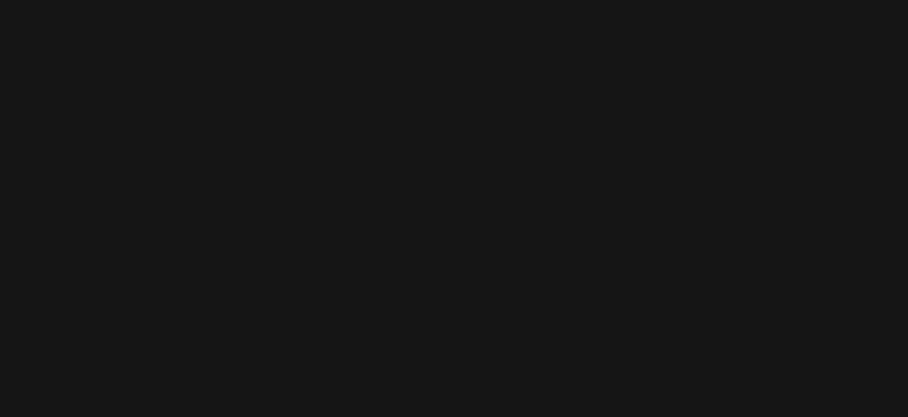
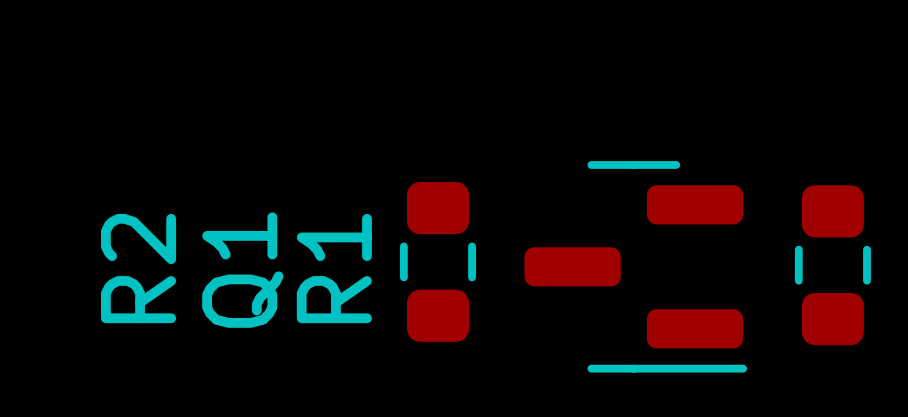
R2: none -> (437, 261)
R1: none -> (832, 265)
Q1: none -> (635, 266)

